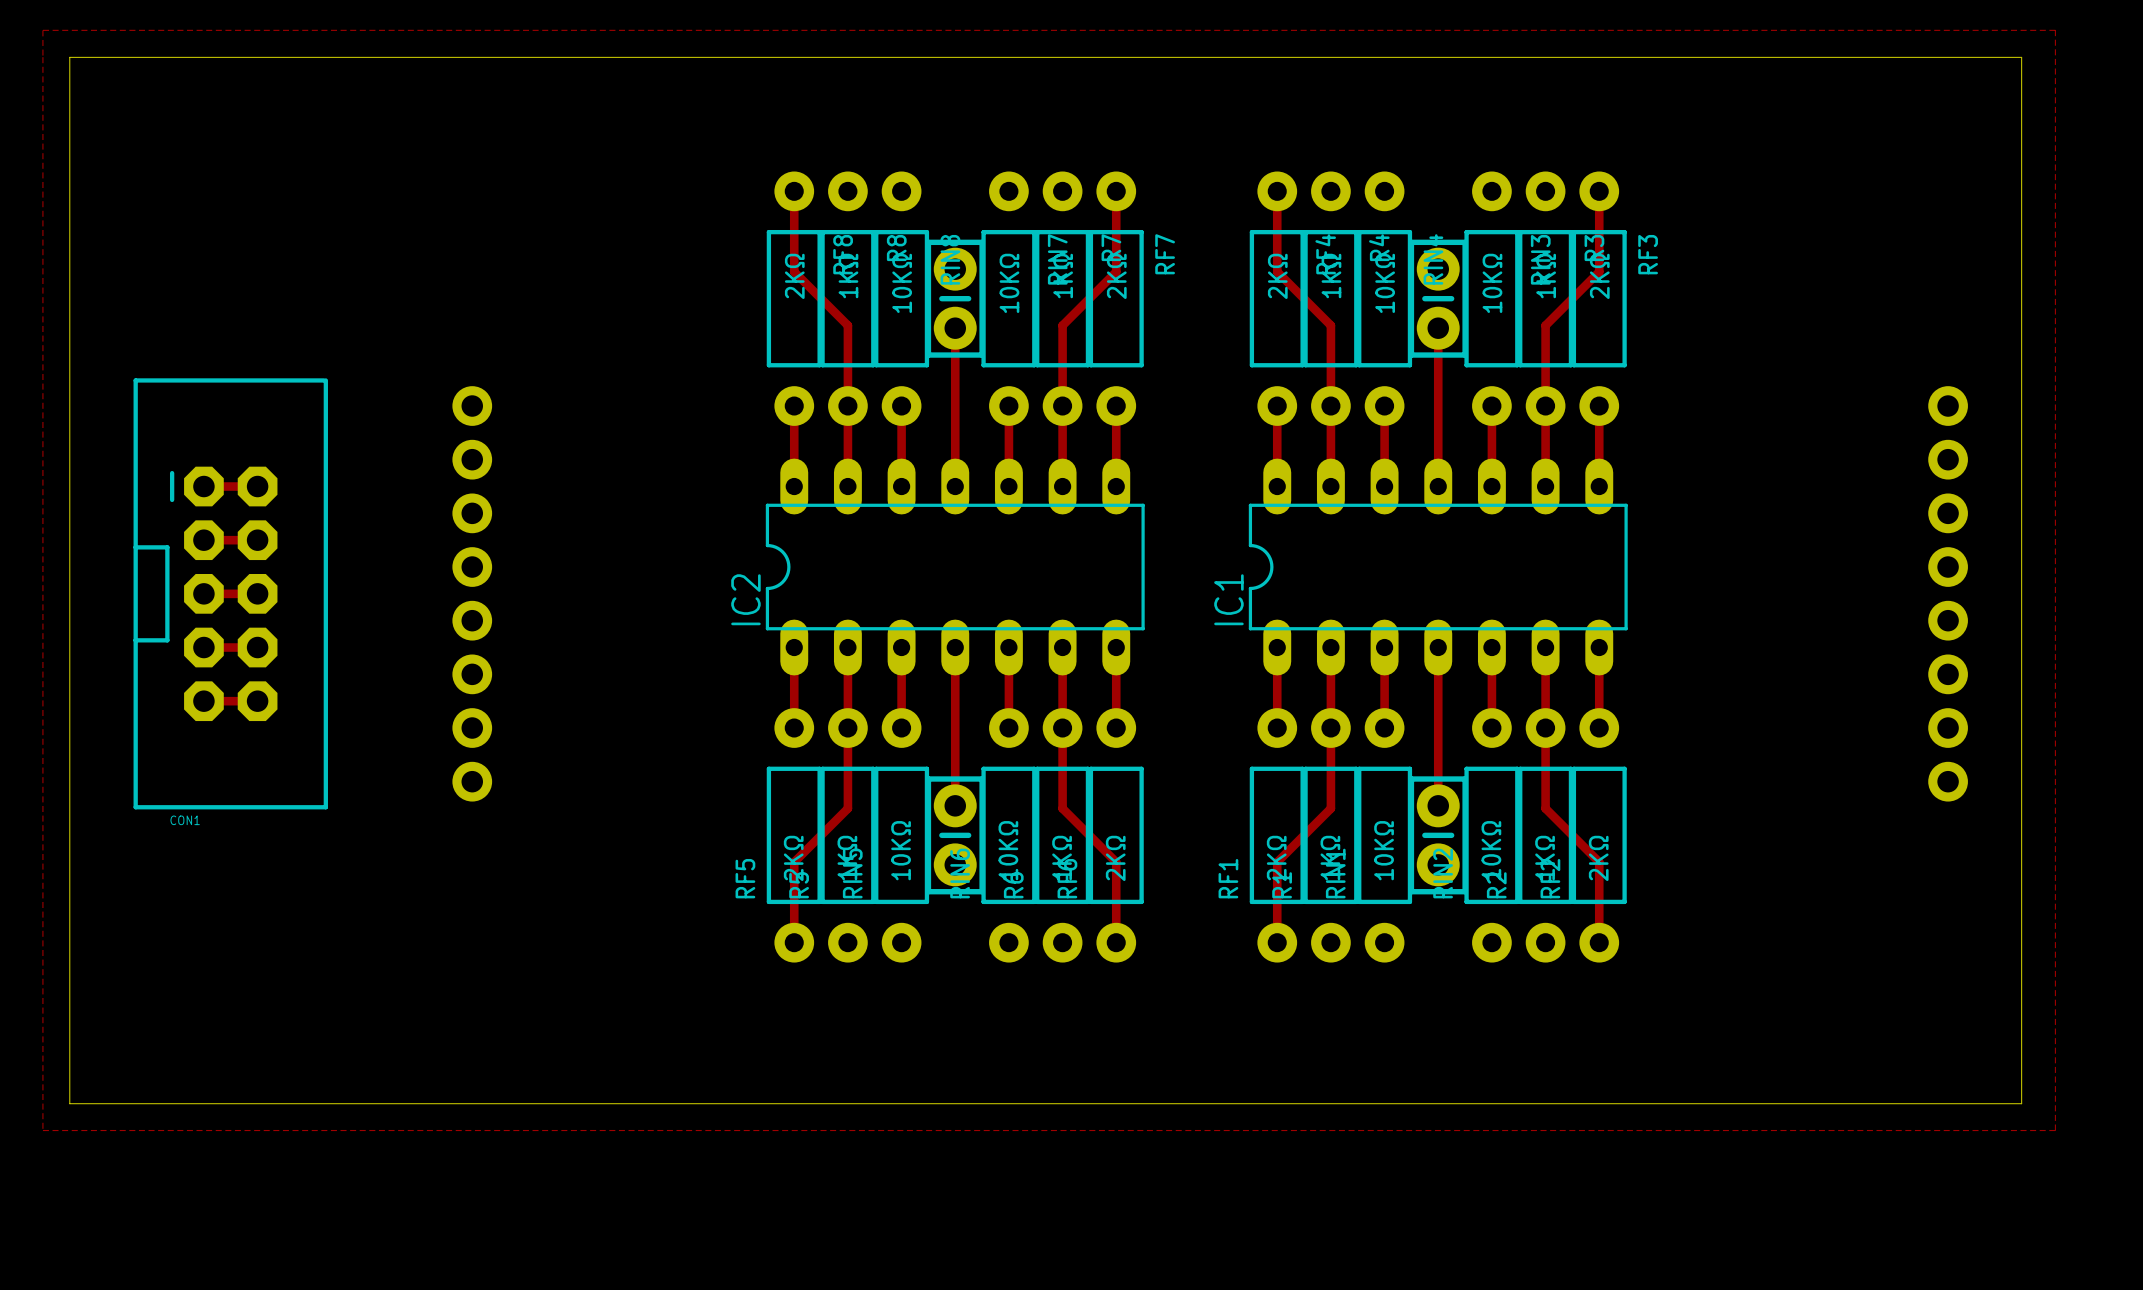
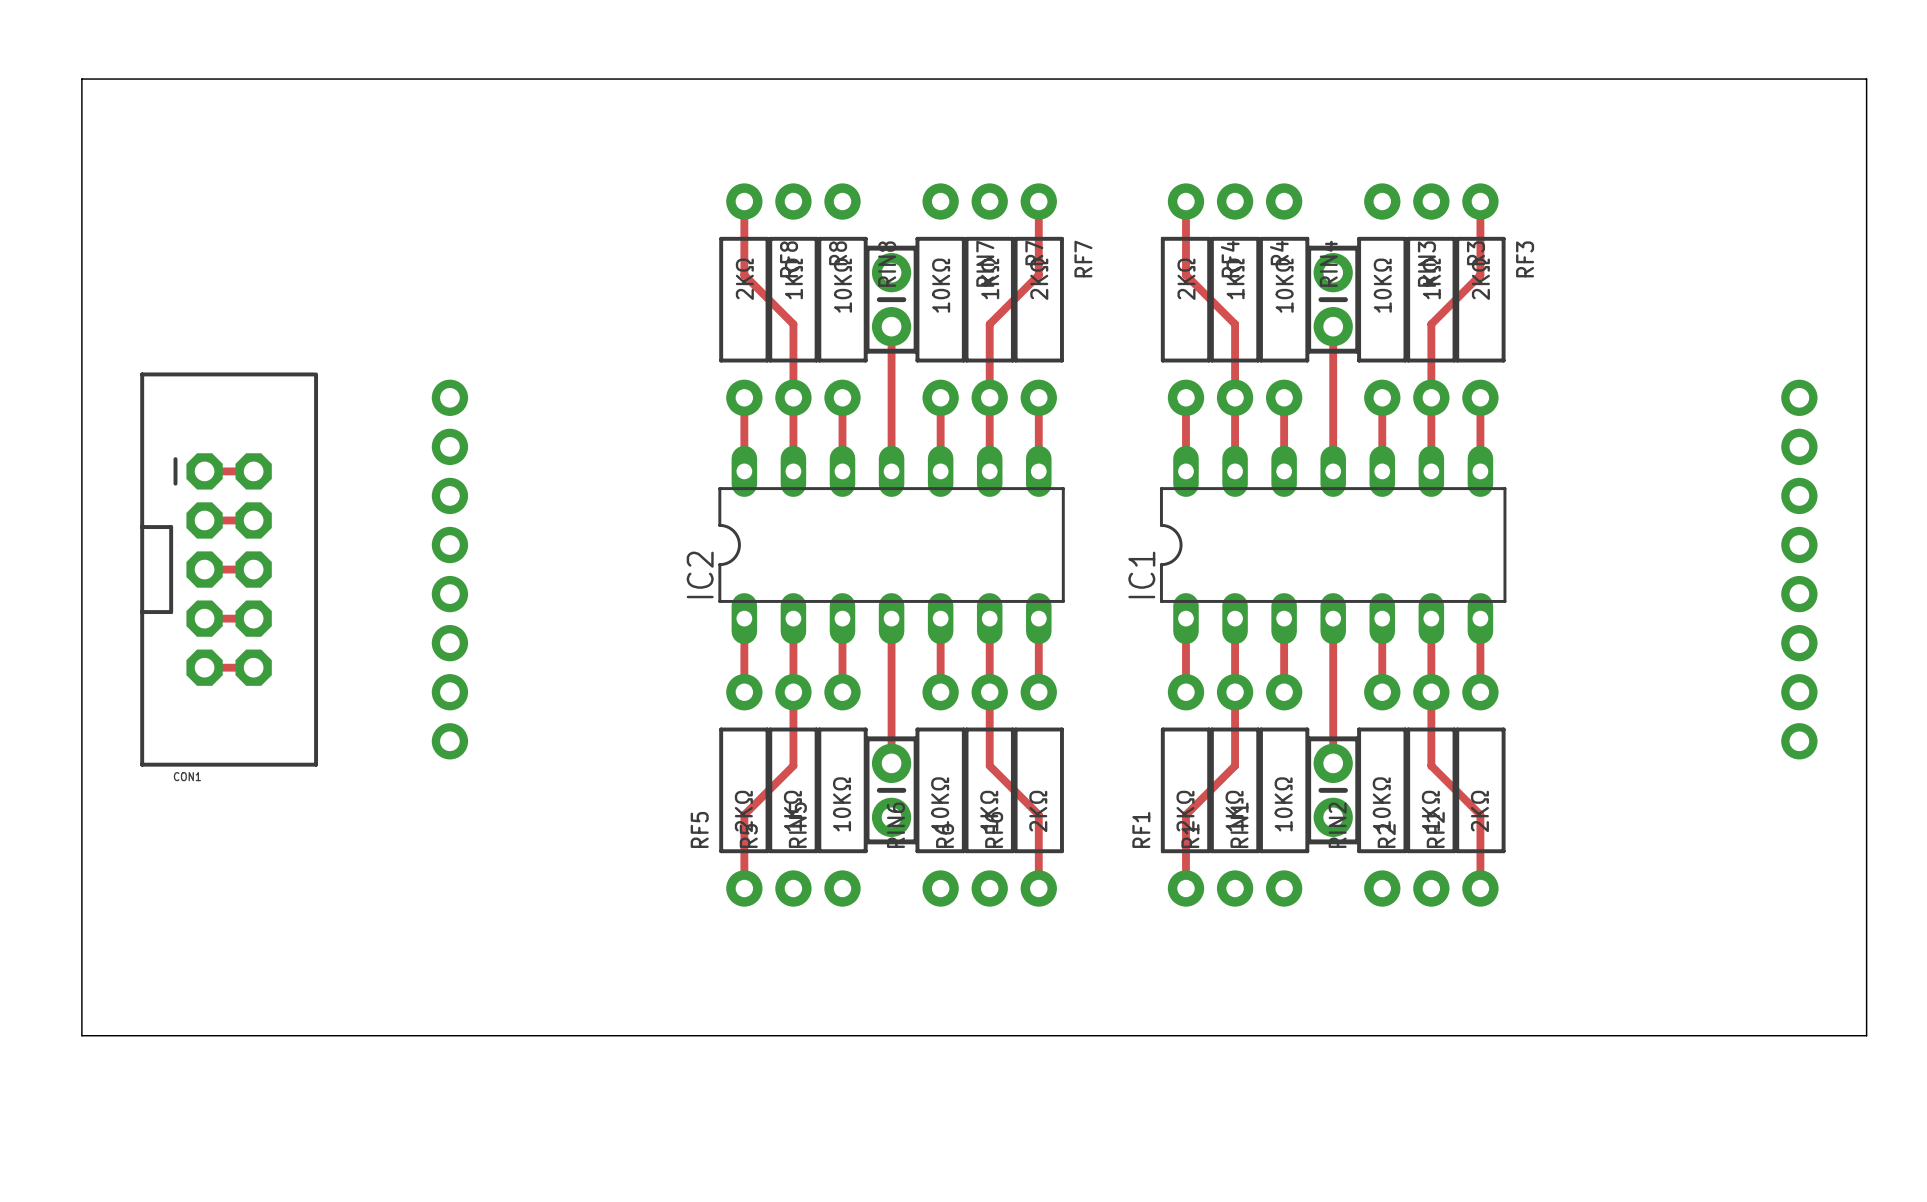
top zone outline: (42, 30) (2055, 30) (2055, 1130) (42, 1130) (42, 30) -> none

